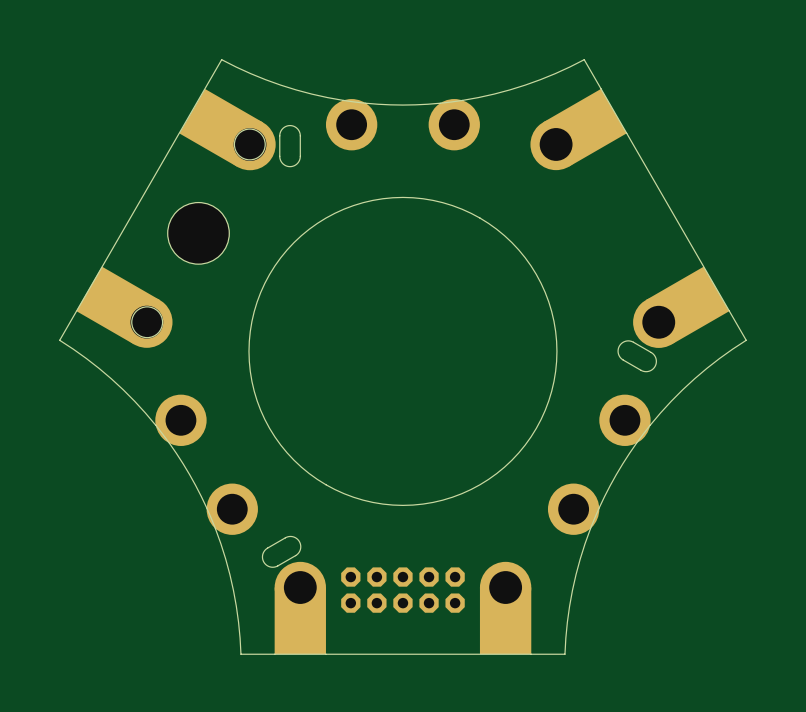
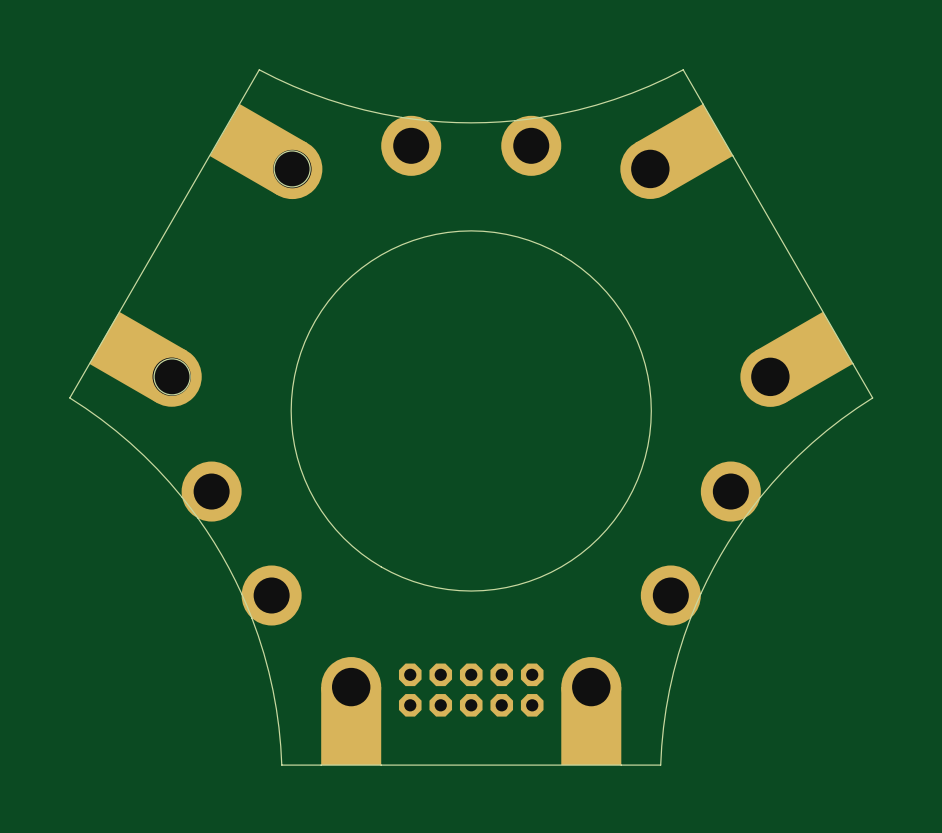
board edge: (300, 135) (298, 161) (292, 166) (284, 165) (279, 157) (281, 130) (286, 126) (292, 125) (298, 129) (300, 135) -> none
hole: (198, 233) -> none
board edge: (633, 342) (655, 356) (656, 364) (651, 370) (642, 370) (619, 356) (618, 349) (621, 343) (626, 340) (633, 342) -> none
board edge: (285, 537) (263, 551) (262, 559) (267, 565) (276, 566) (299, 551) (300, 545) (297, 539) (291, 536) (285, 537) -> none

